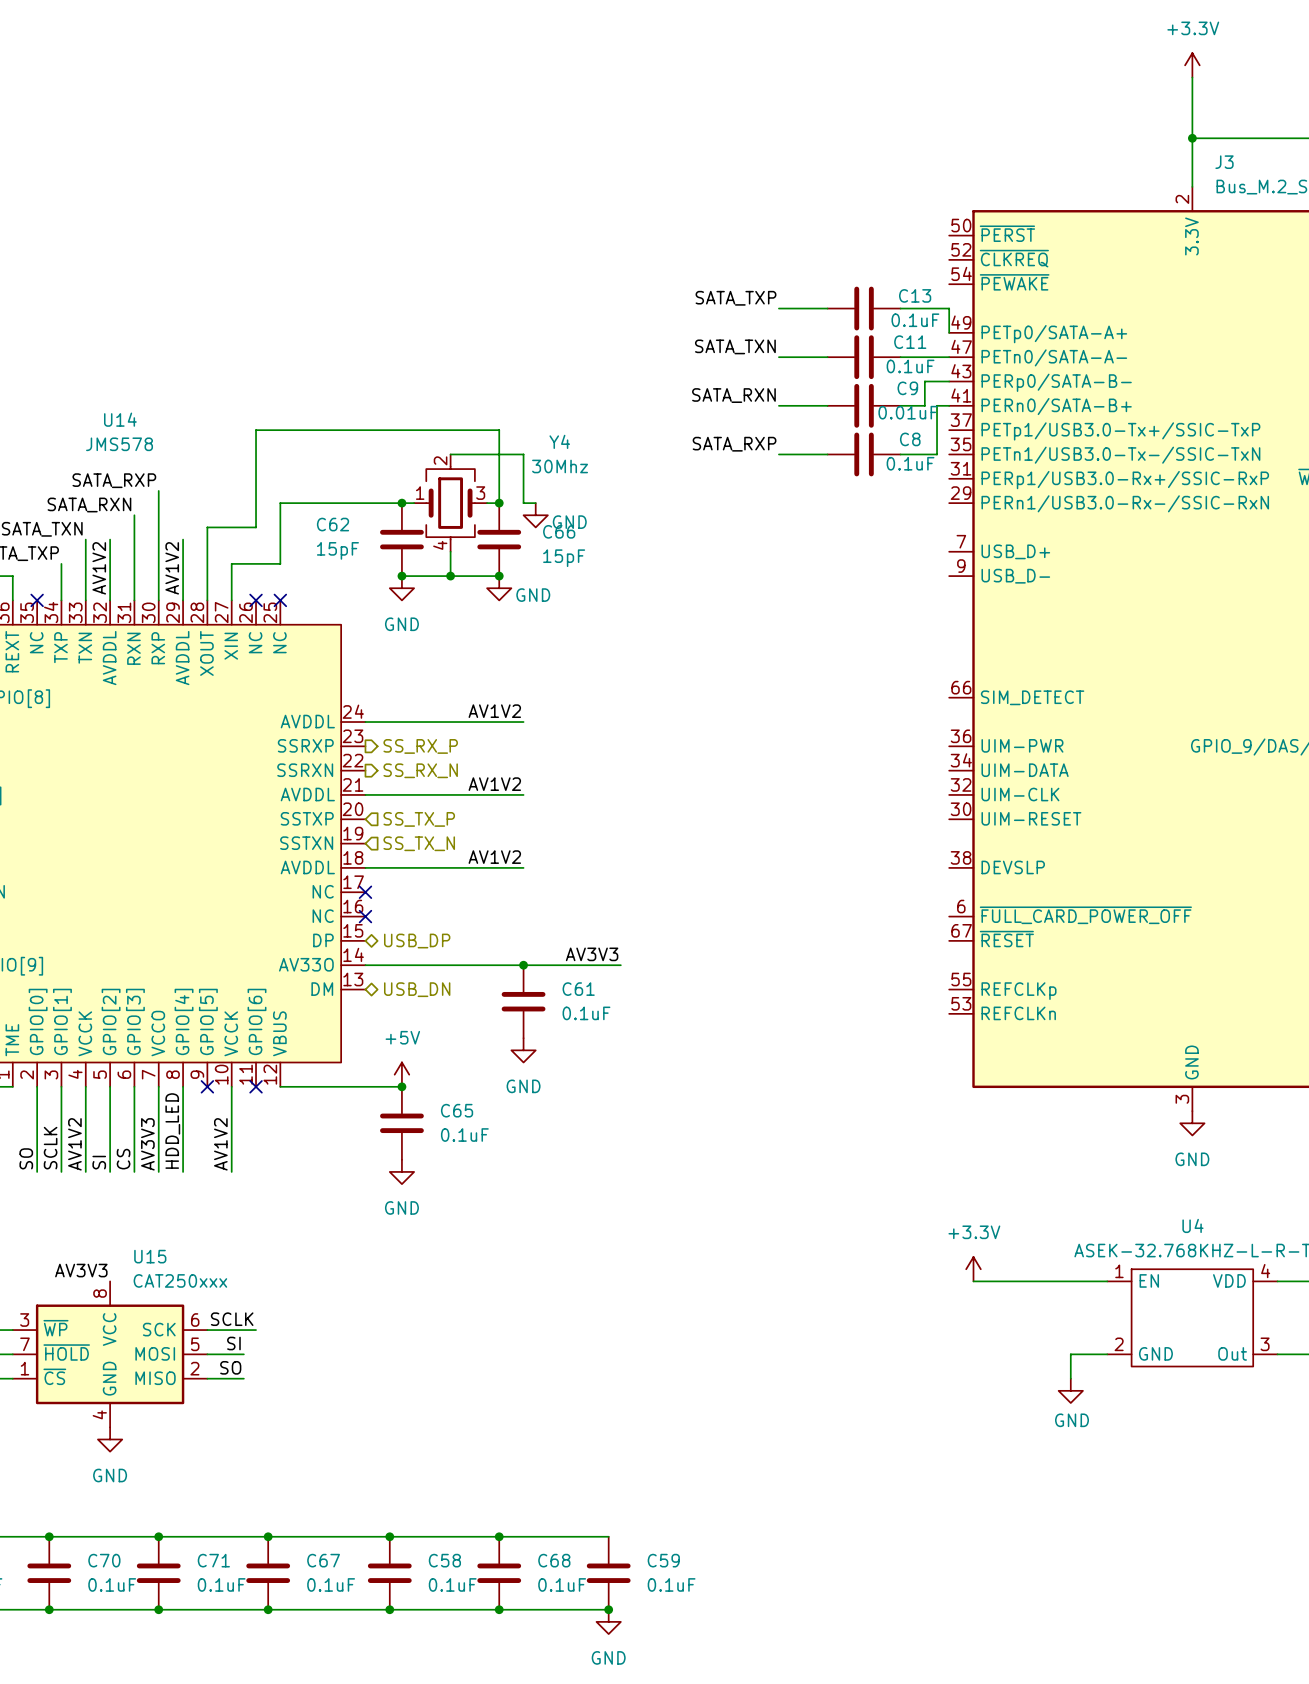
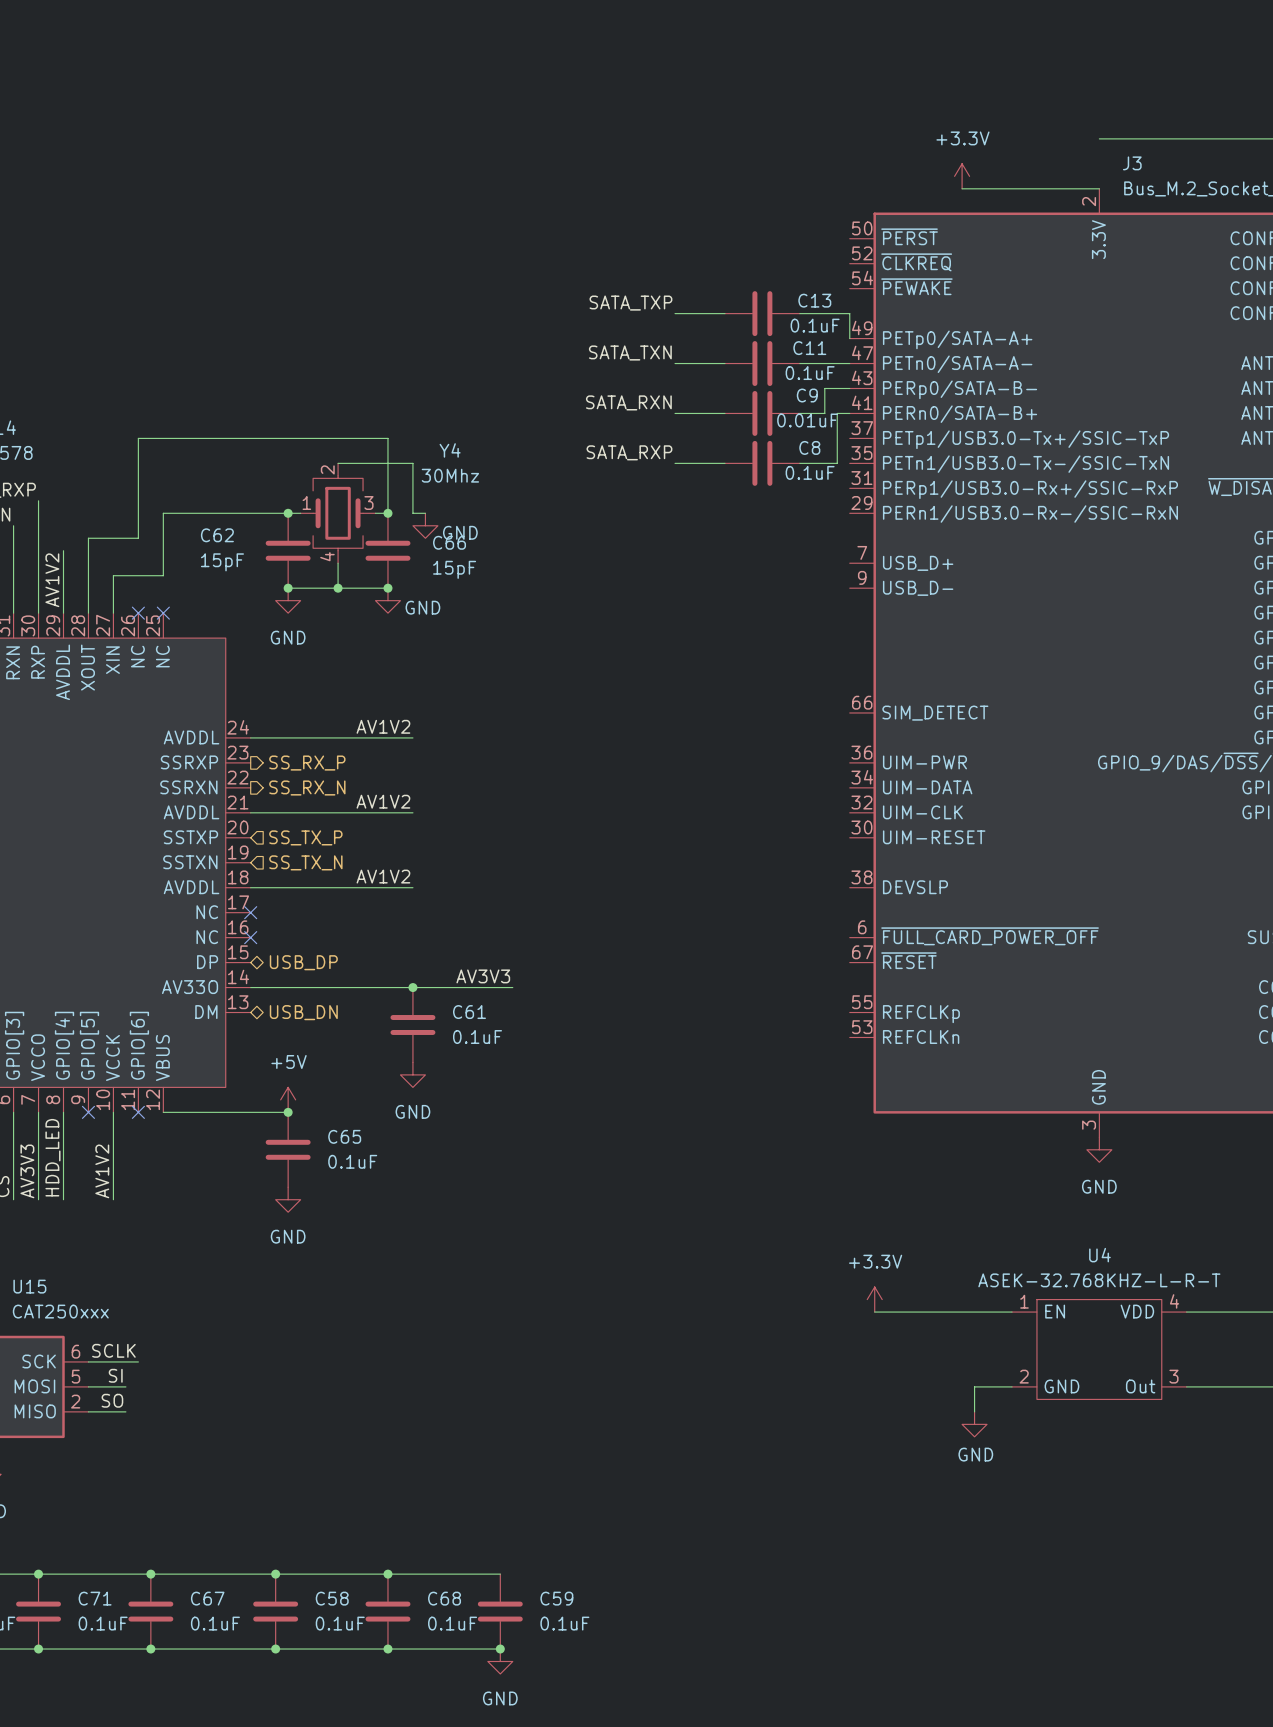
power symbol position: +3.3V (1192, 65) -> +3.3V (962, 176)
wire: (1192, 77) (1192, 186) -> (962, 188) (1099, 188)
junction: (1192, 138) -> none

